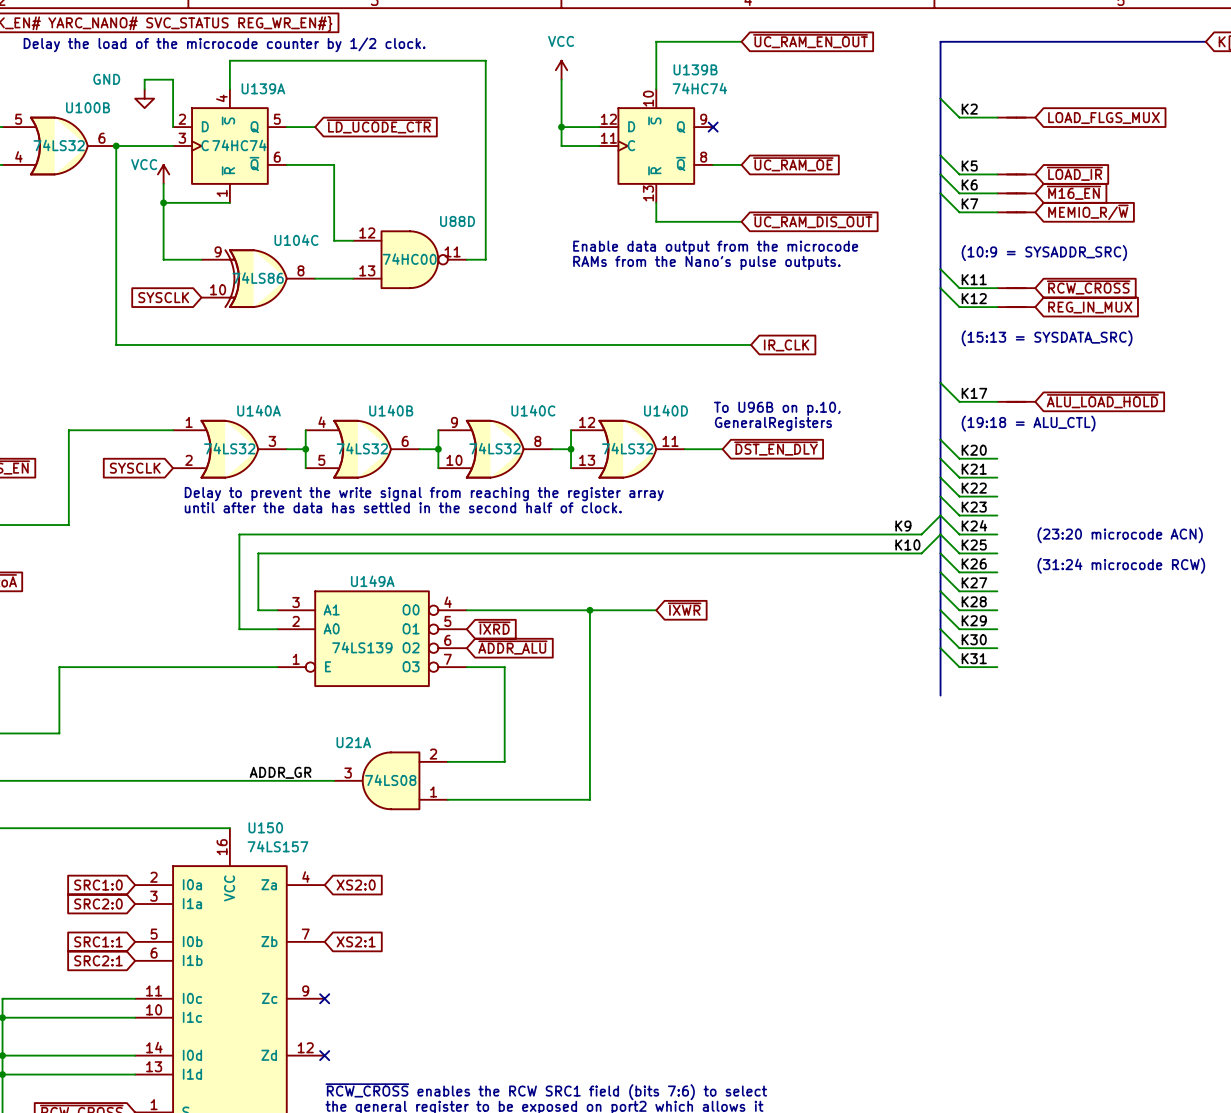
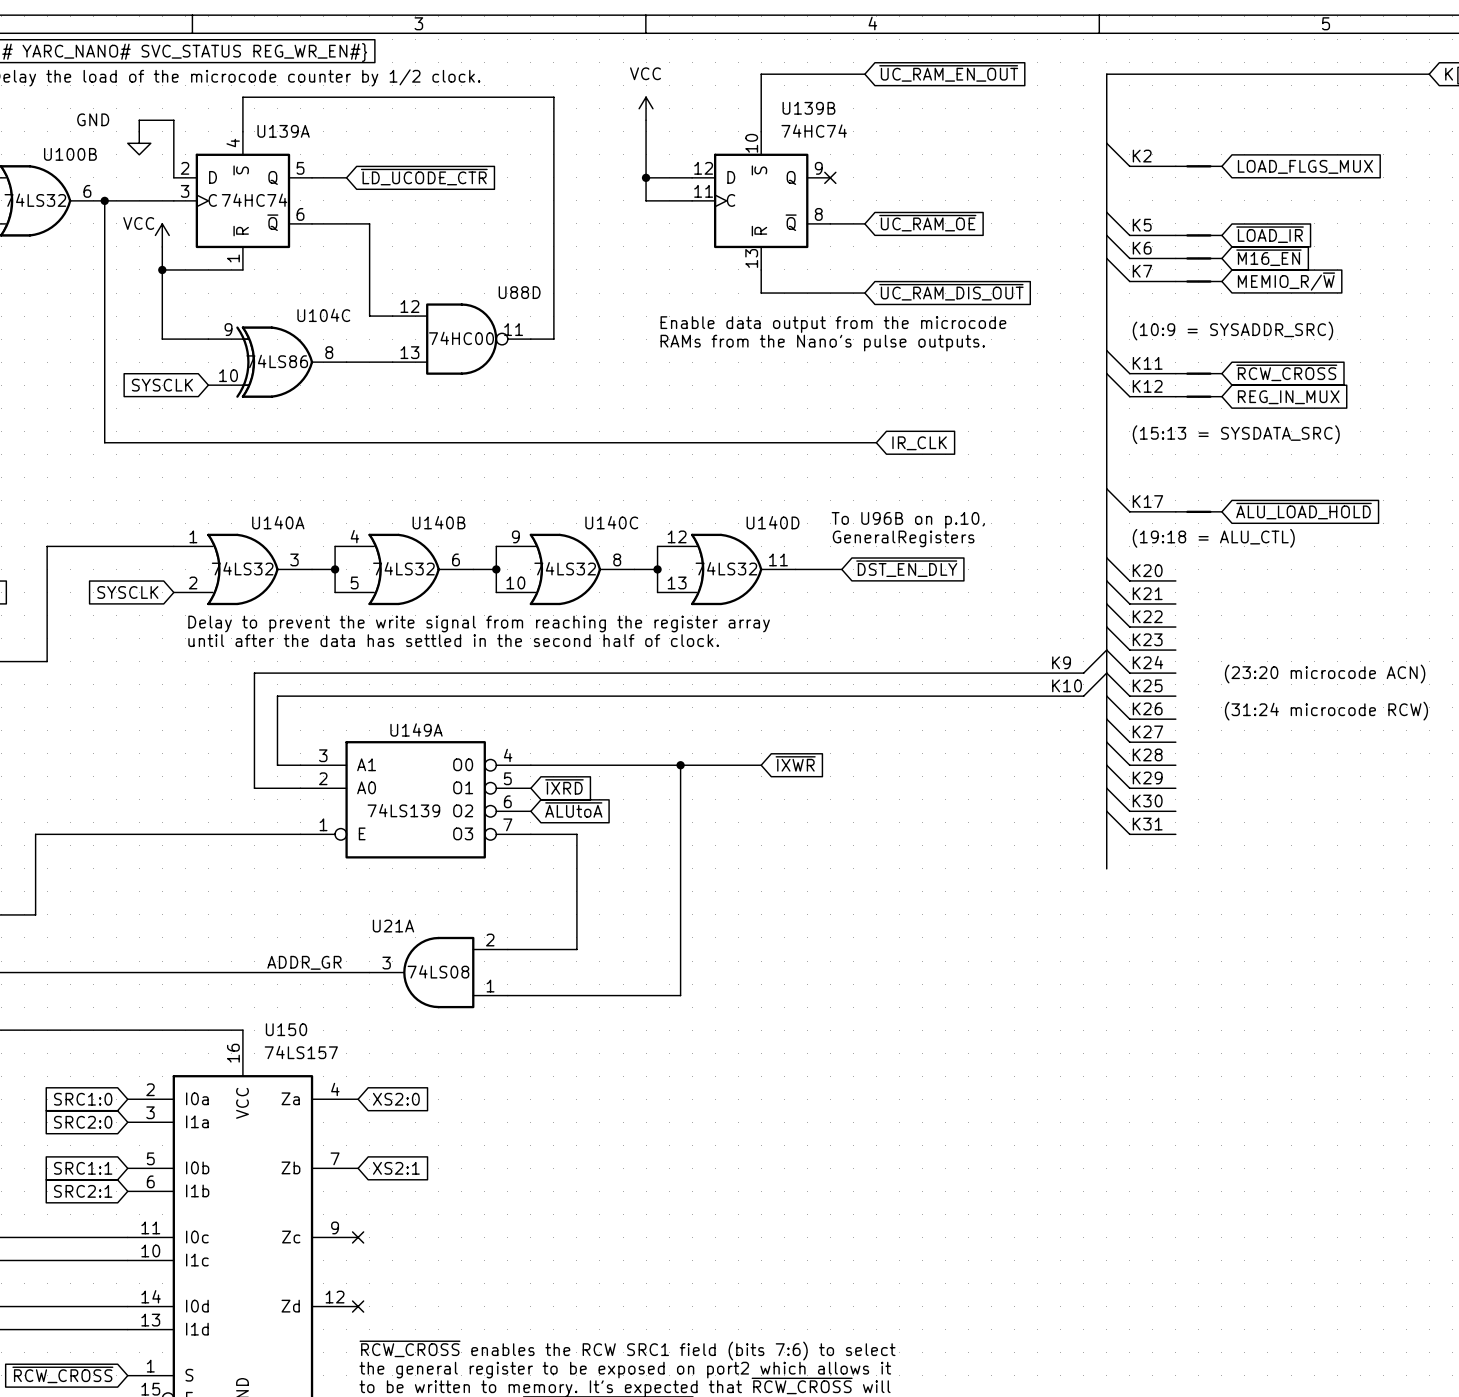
global label: ~{ADDR_ALU} (512, 647) -> ~{ALUtoA} (573, 809)

